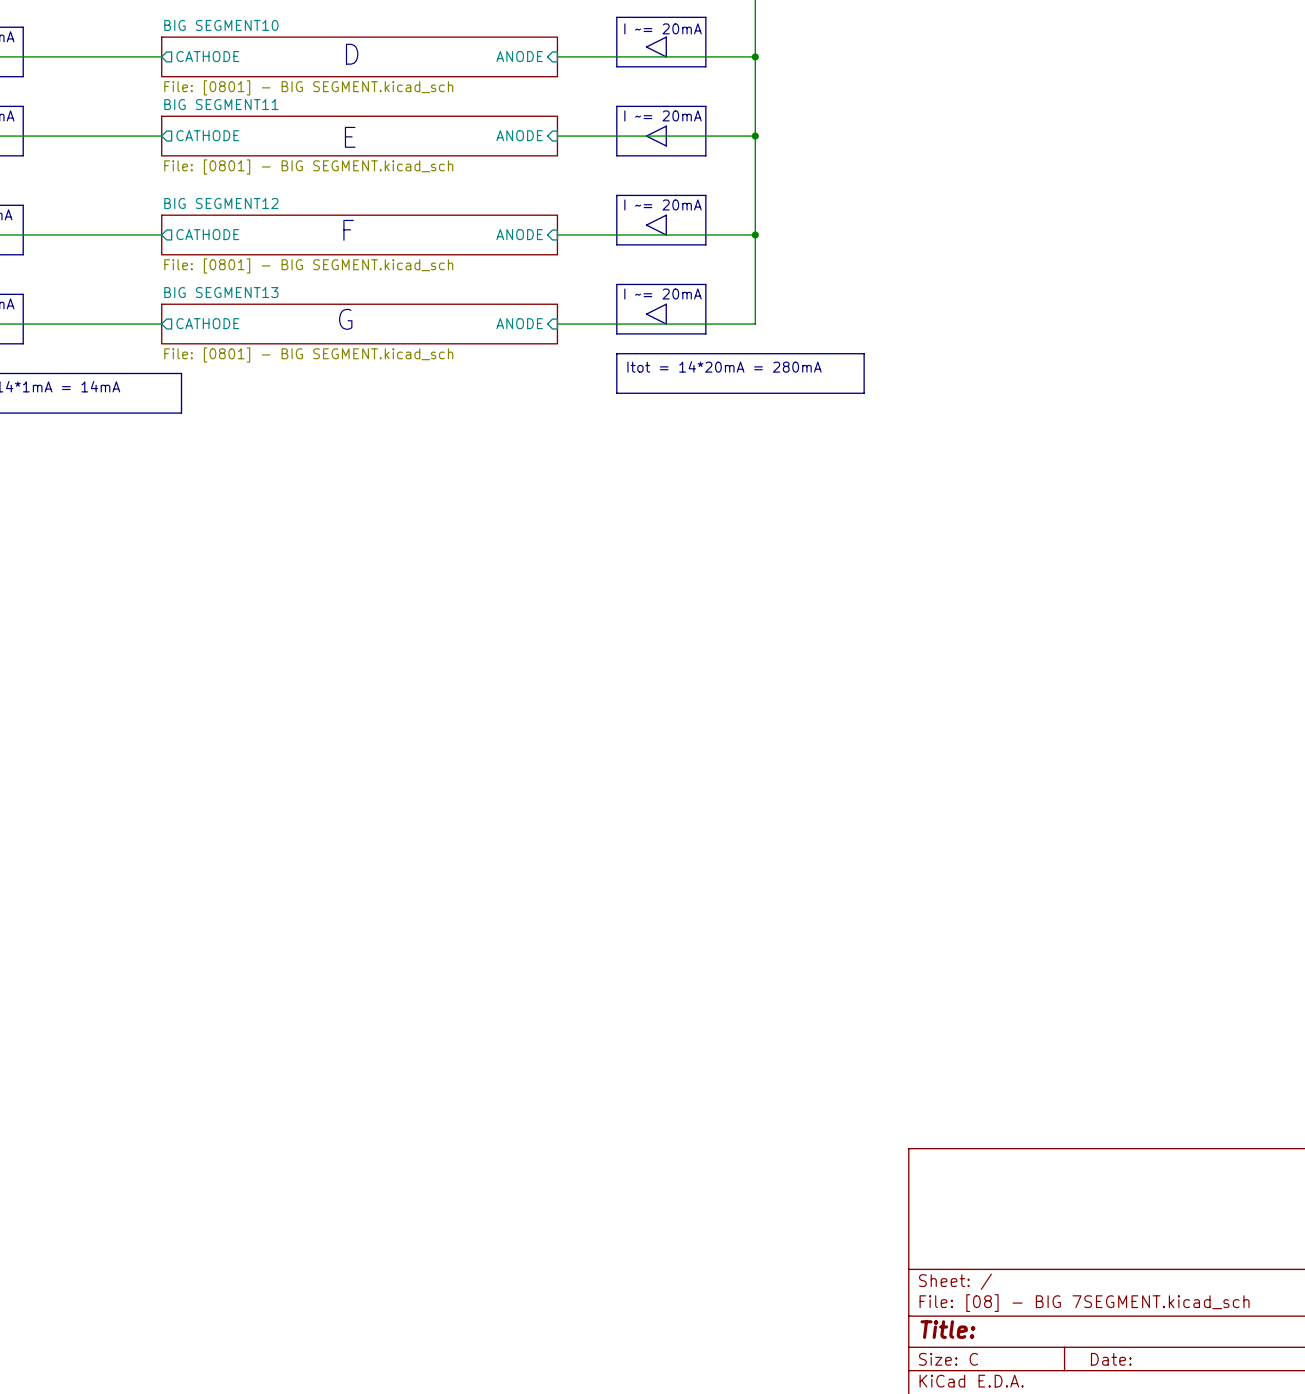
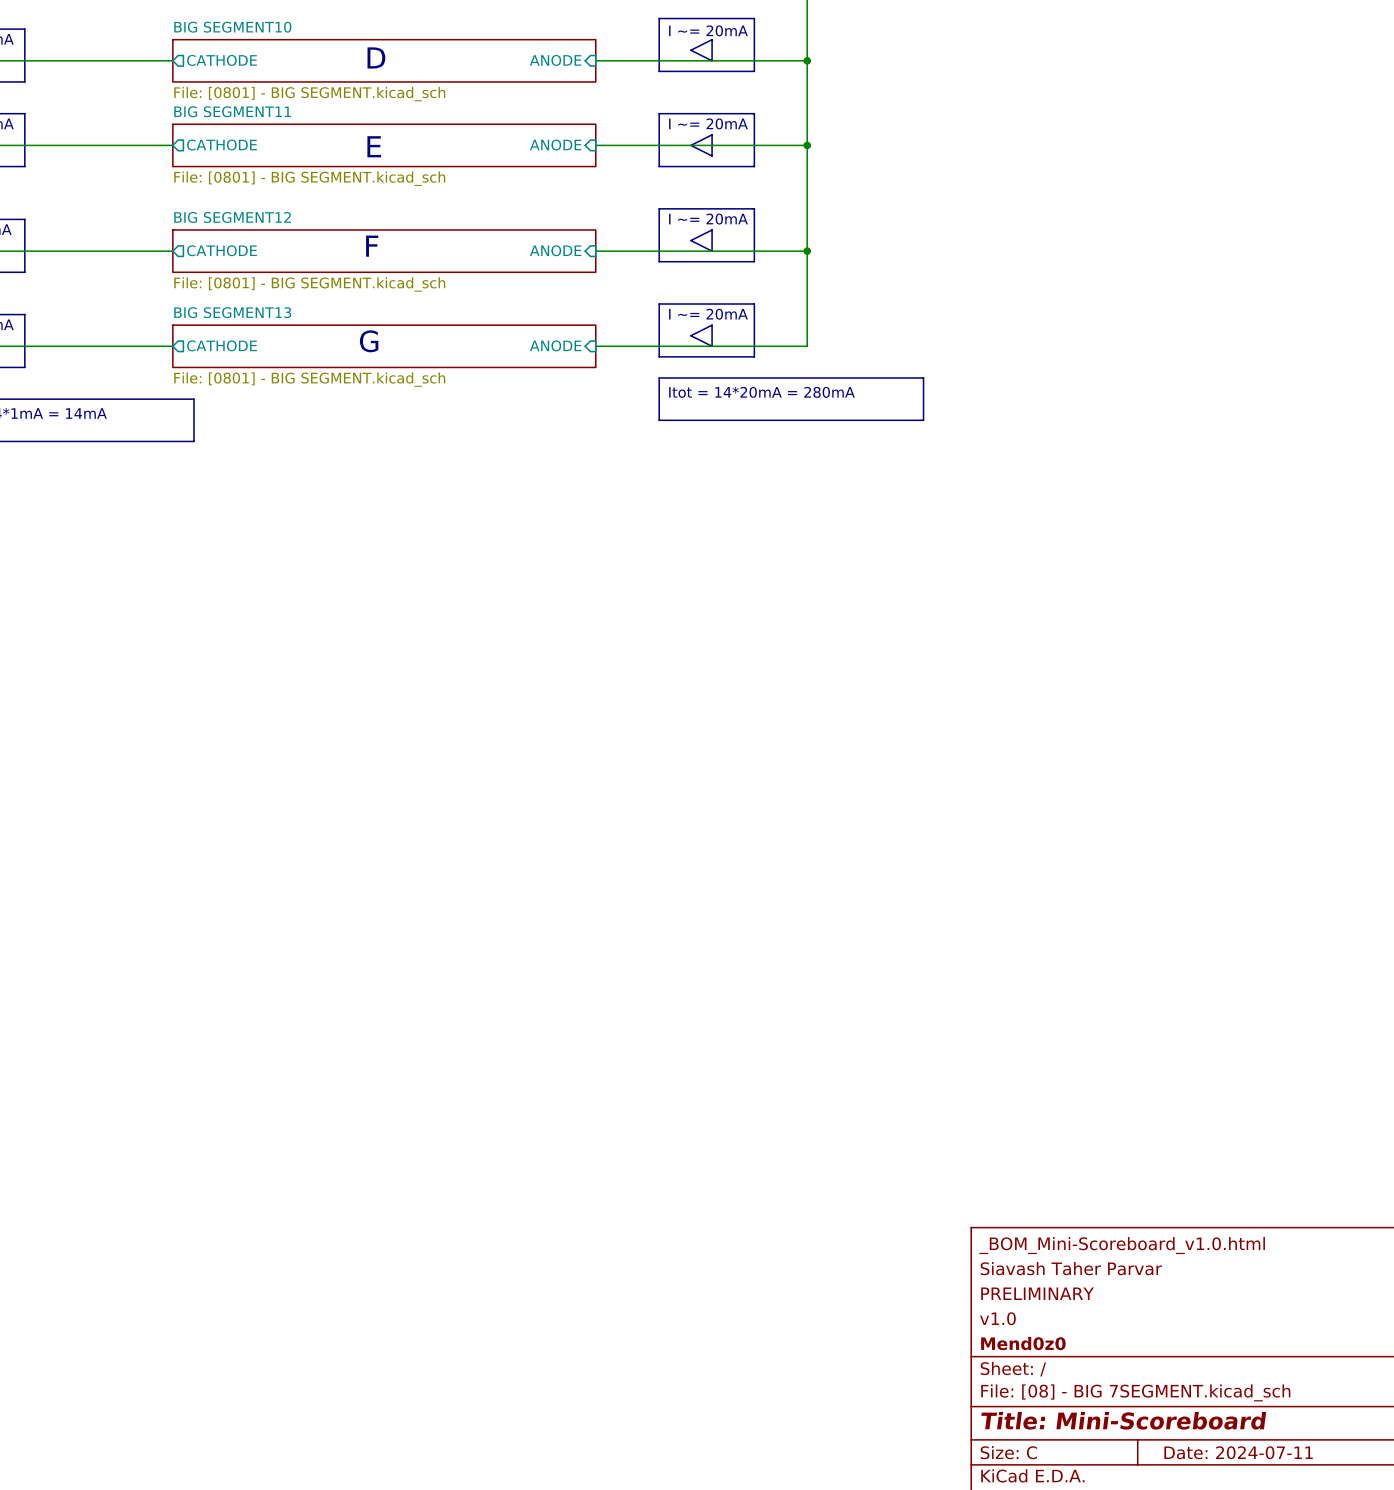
title block: none -> _BOM_Mini-Scoreboard_v1.0.html (1122, 1245)
title block: none -> Siavash Taher Parvar (1071, 1268)
title block: none -> PRELIMINARY (1037, 1293)
title block: none -> v1.0 (997, 1318)
title block: none -> Mend0z0 (1023, 1343)
title block: Title: (947, 1329) -> Title: Mini-Scoreboard (1123, 1420)
title block: Date: (1111, 1359) -> Date: 2024-07-11 (1238, 1452)

